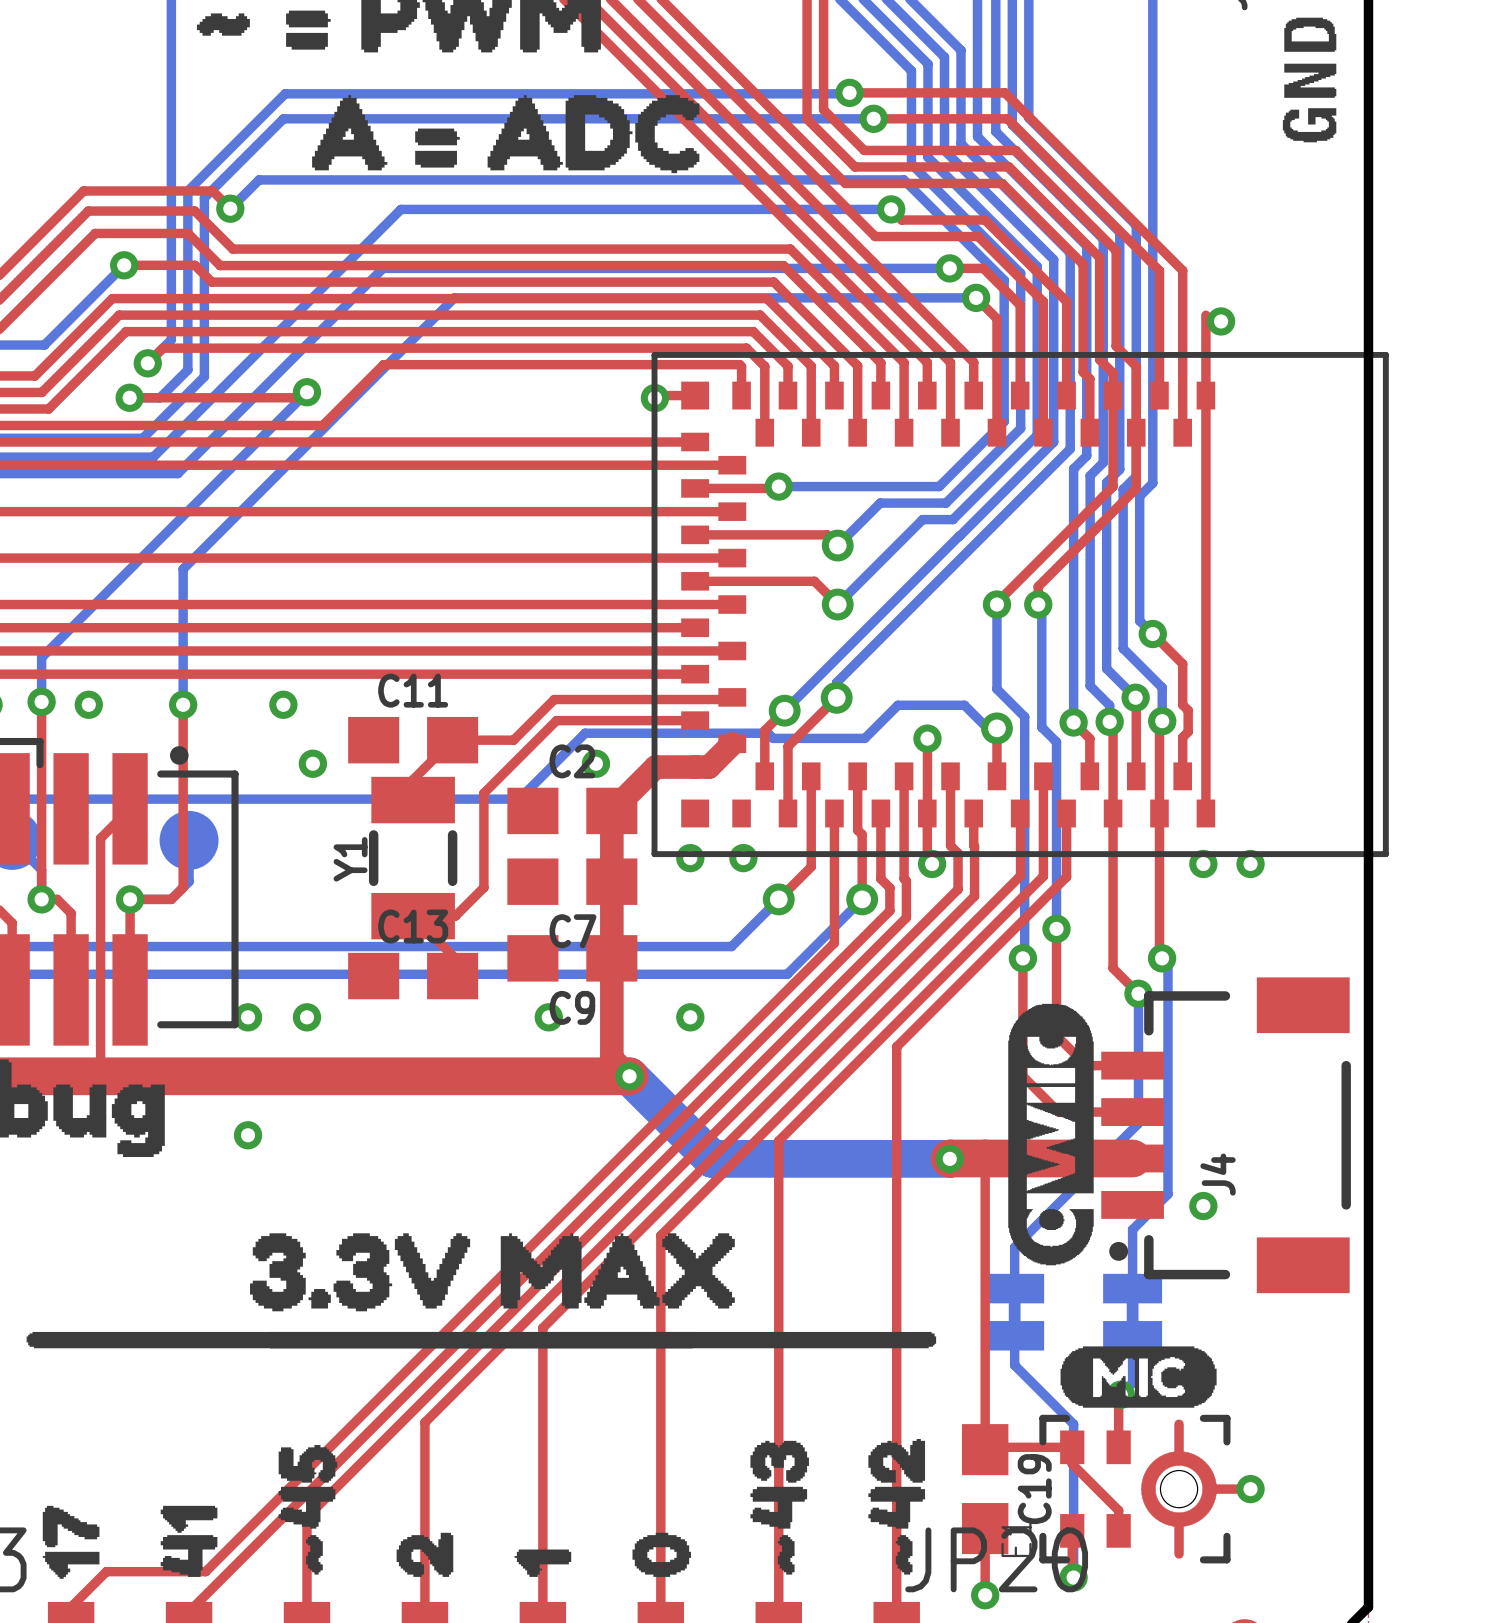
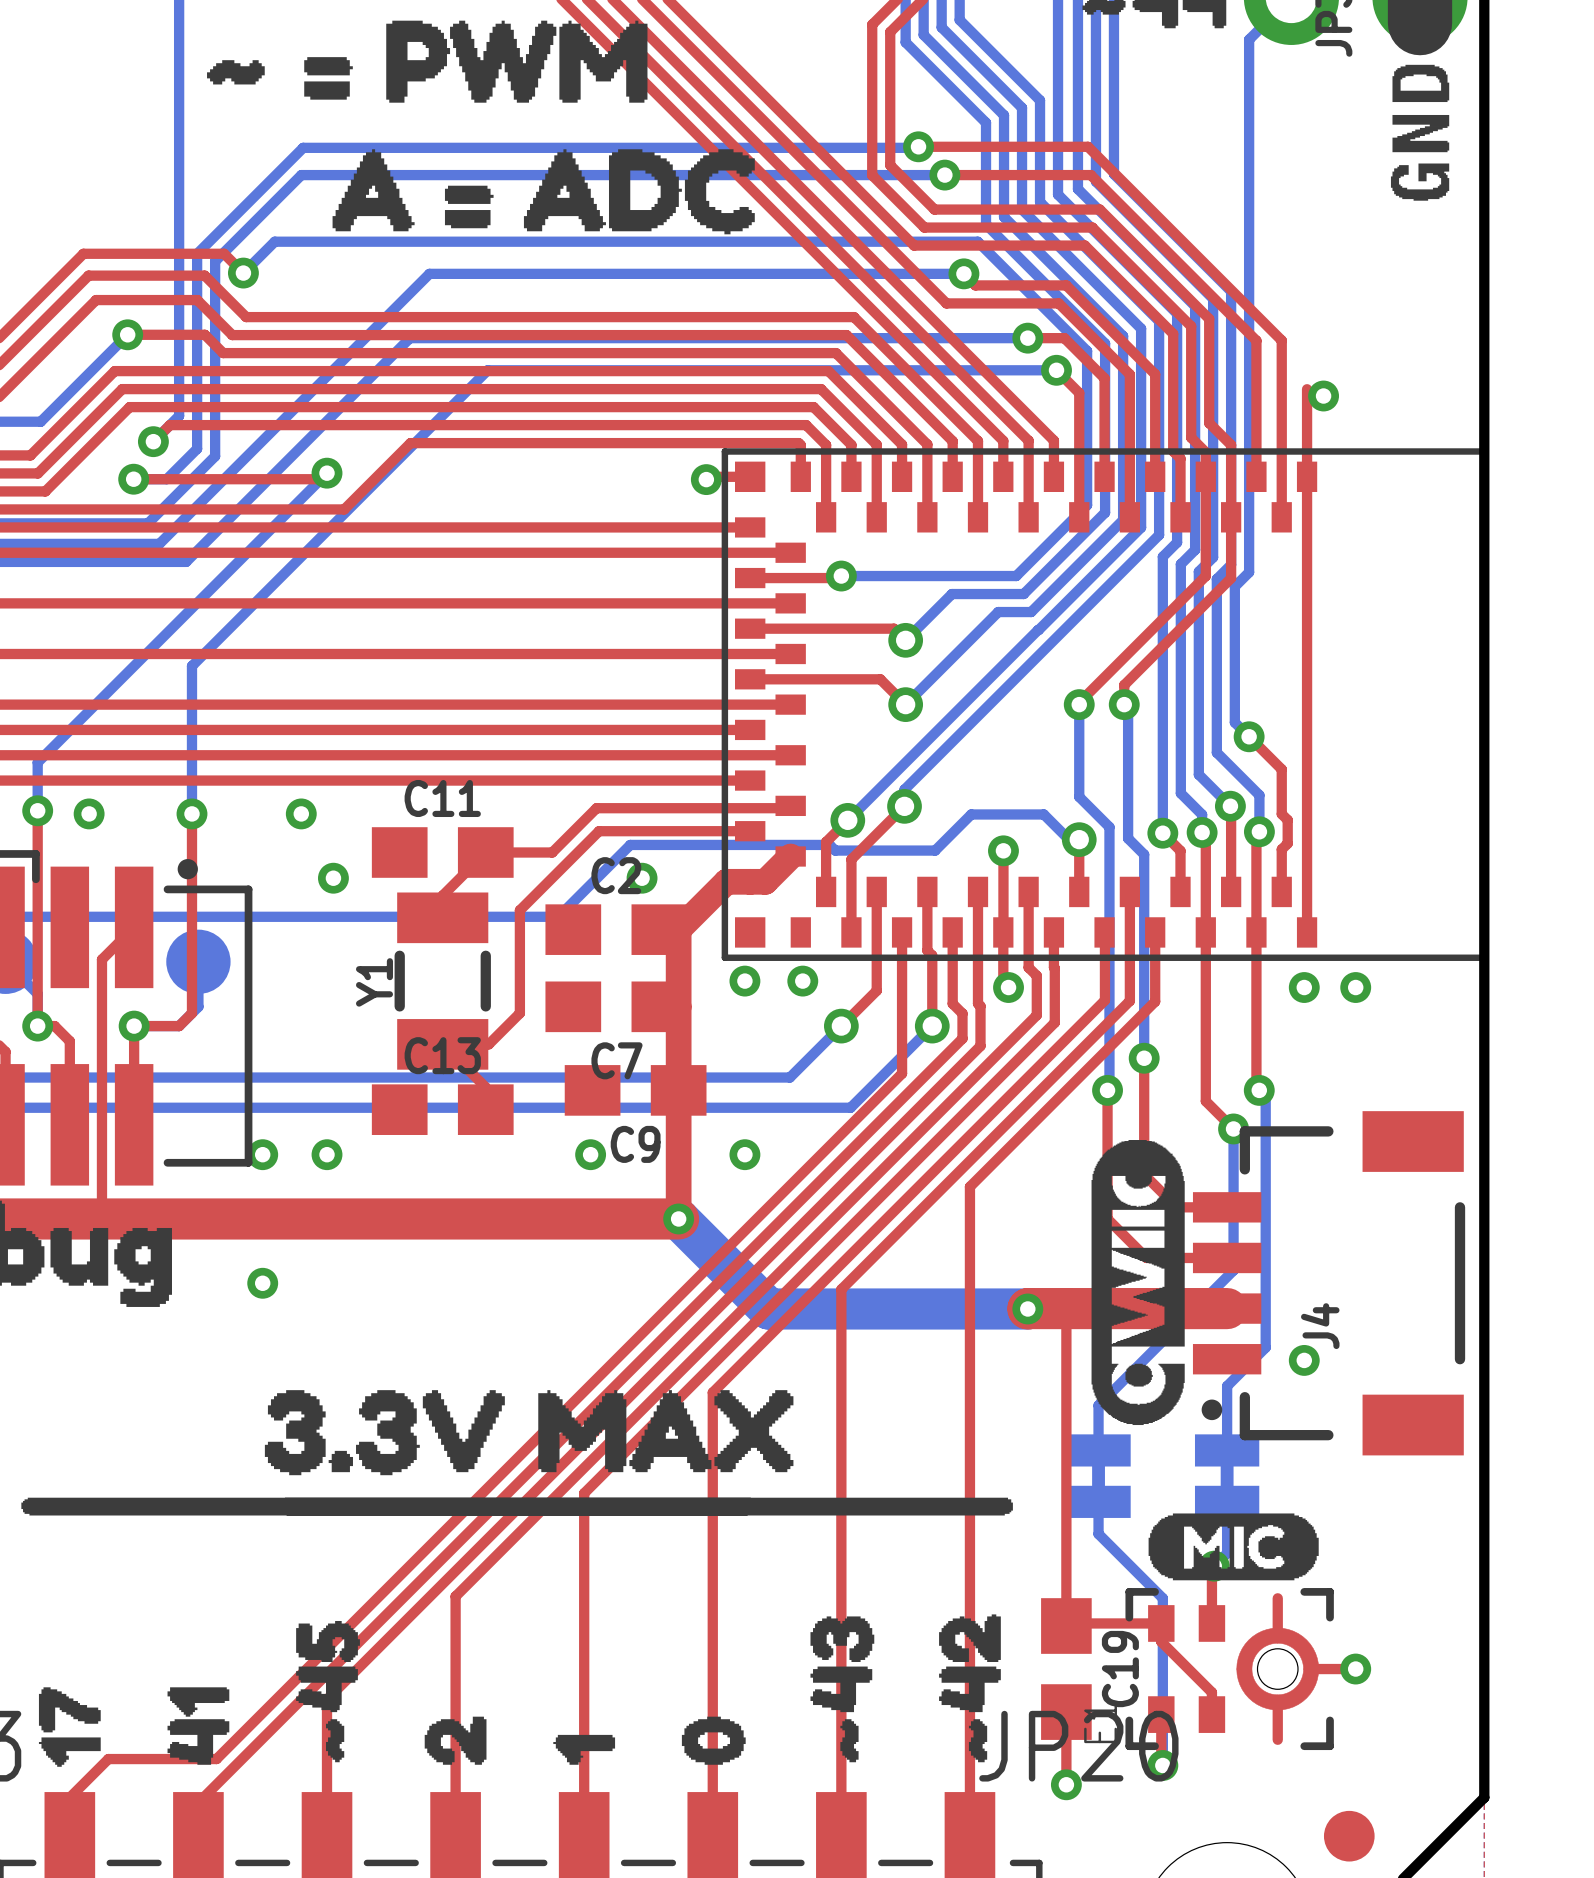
part footprint: [651, 351, 1389, 858] -> [721, 448, 1488, 961]
top track: (673, 767) (655, 767) (611, 810) (611, 1058) (629, 1076) -> (726, 881) (678, 929) (678, 1218)
C9 position: (572, 958) -> (635, 1090)

